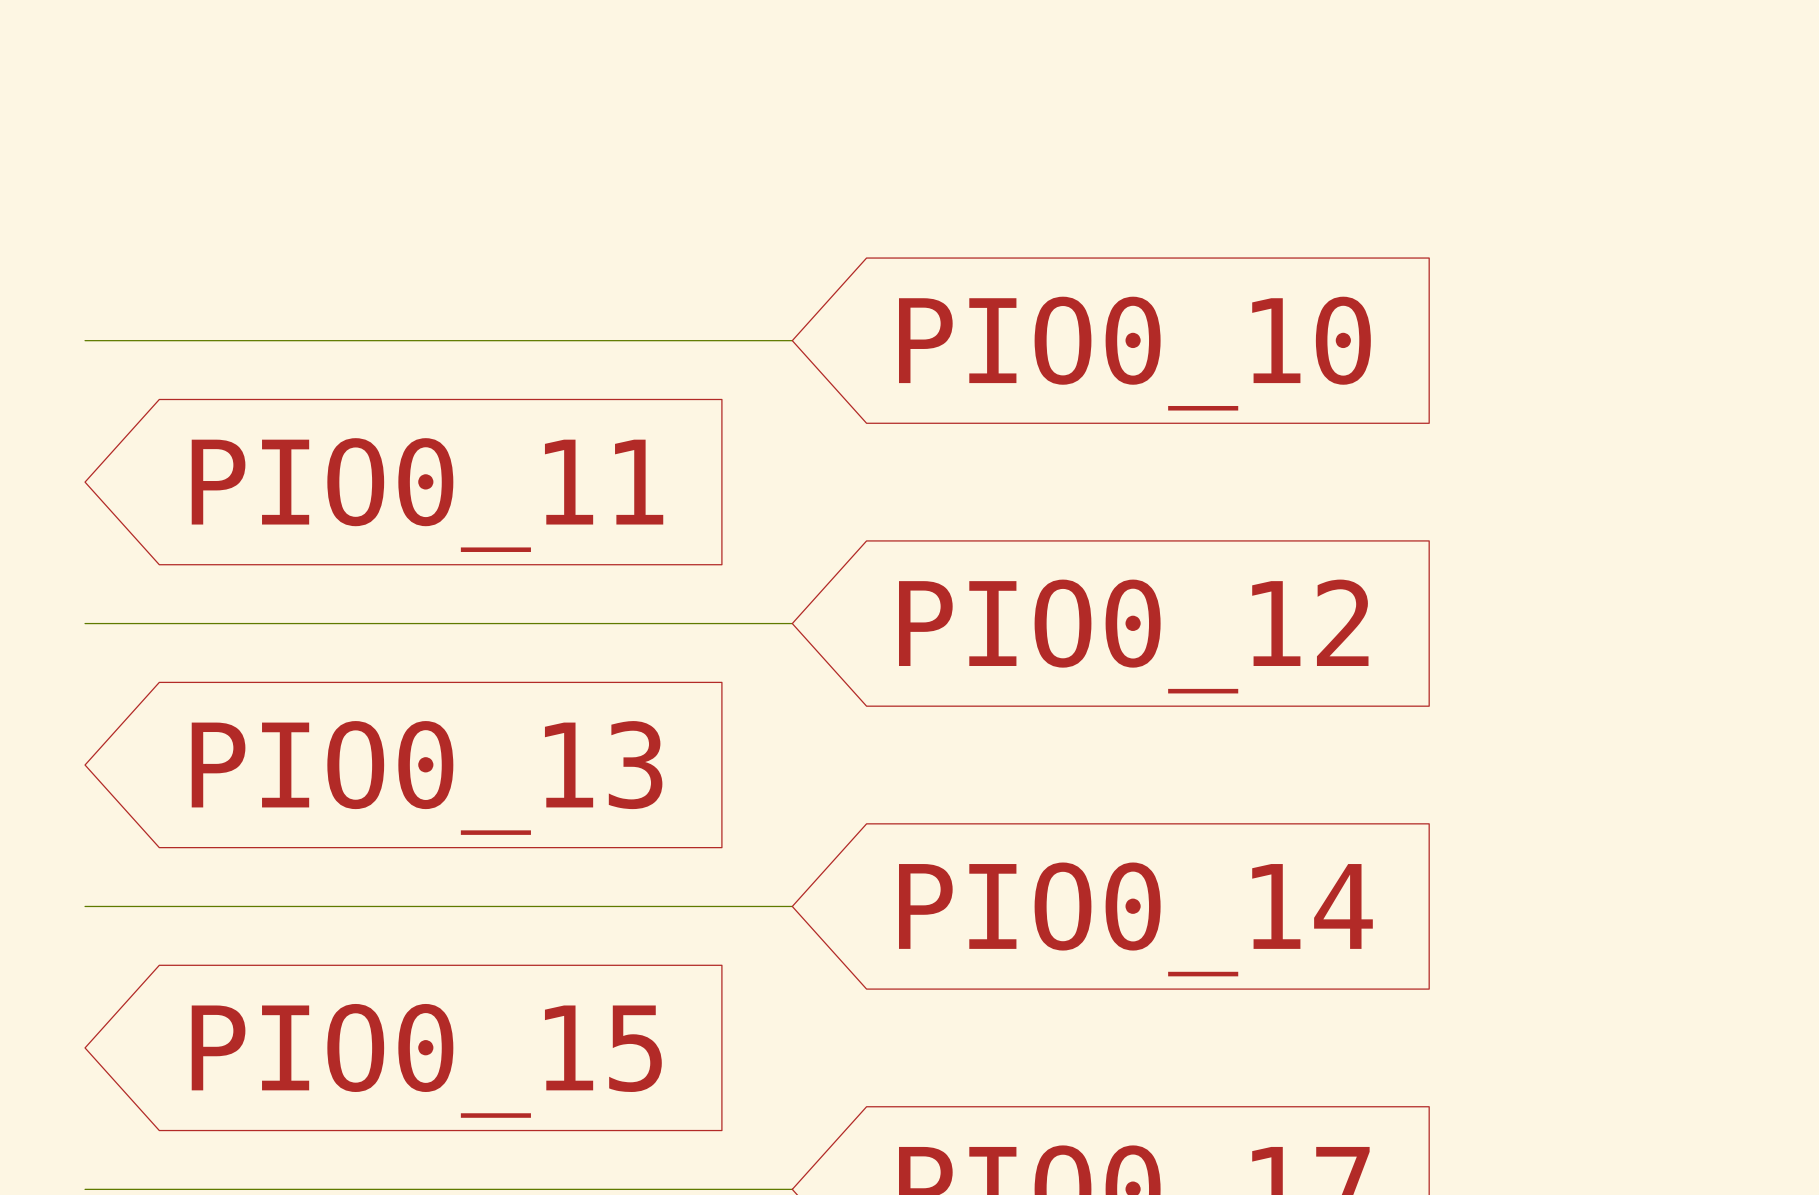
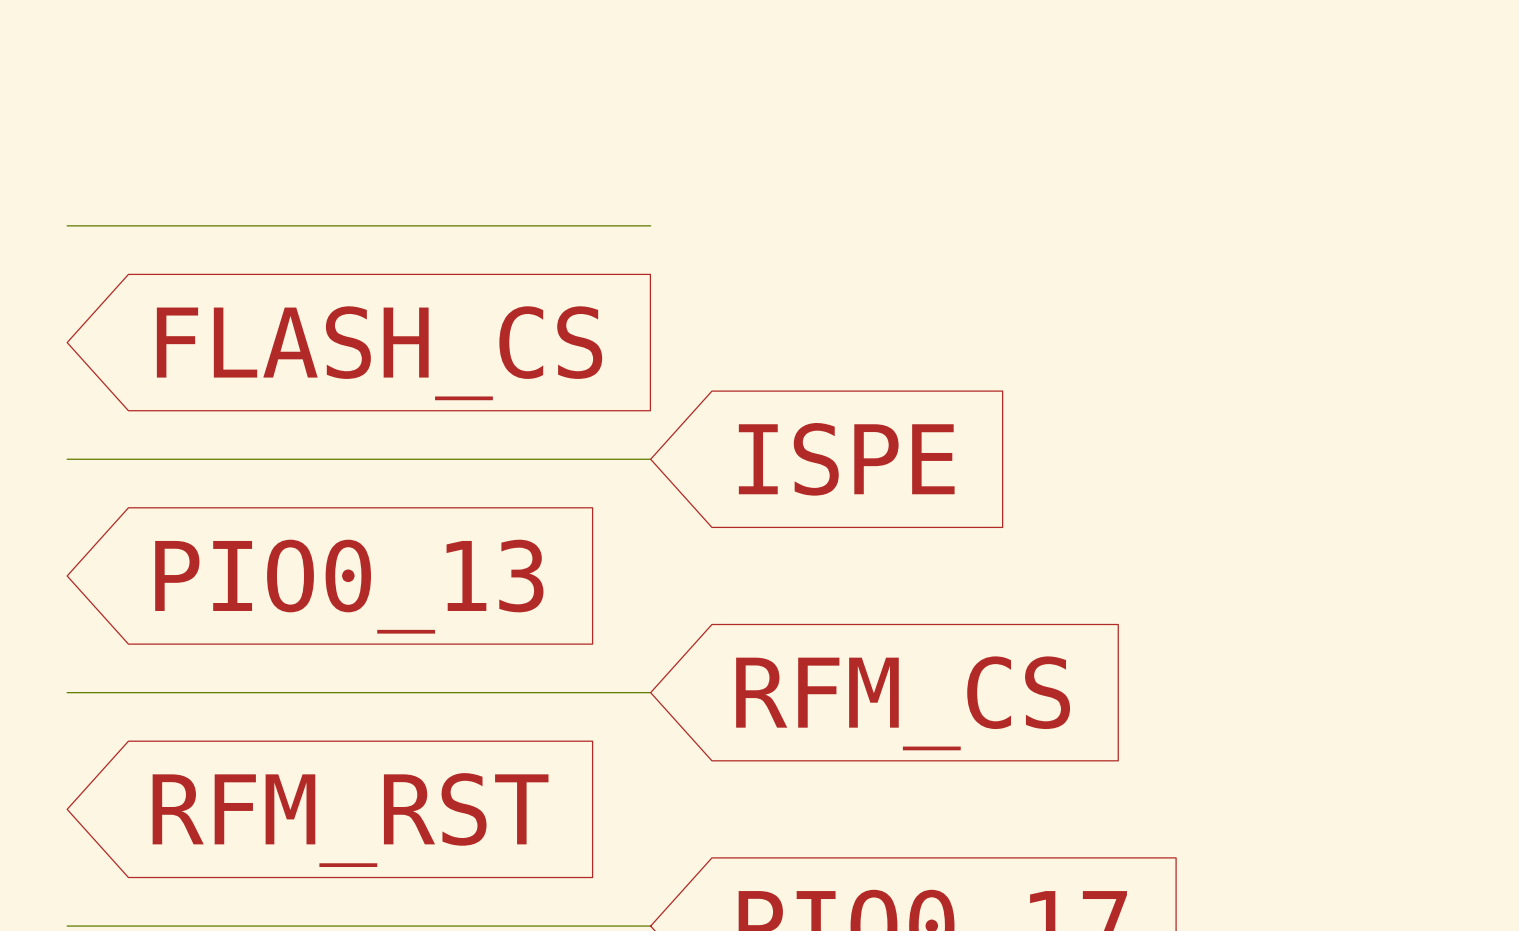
global label: PIO0_10 (1134, 353) -> none
global label: PIO0_11 (427, 495) -> FLASH_CS (379, 353)
global label: PIO0_12 (1133, 636) -> ISPE (846, 459)
global label: PIO0_14 (1135, 919) -> RFM_CS (903, 703)
global label: PIO0_15 (426, 1060) -> RFM_RST (350, 820)

